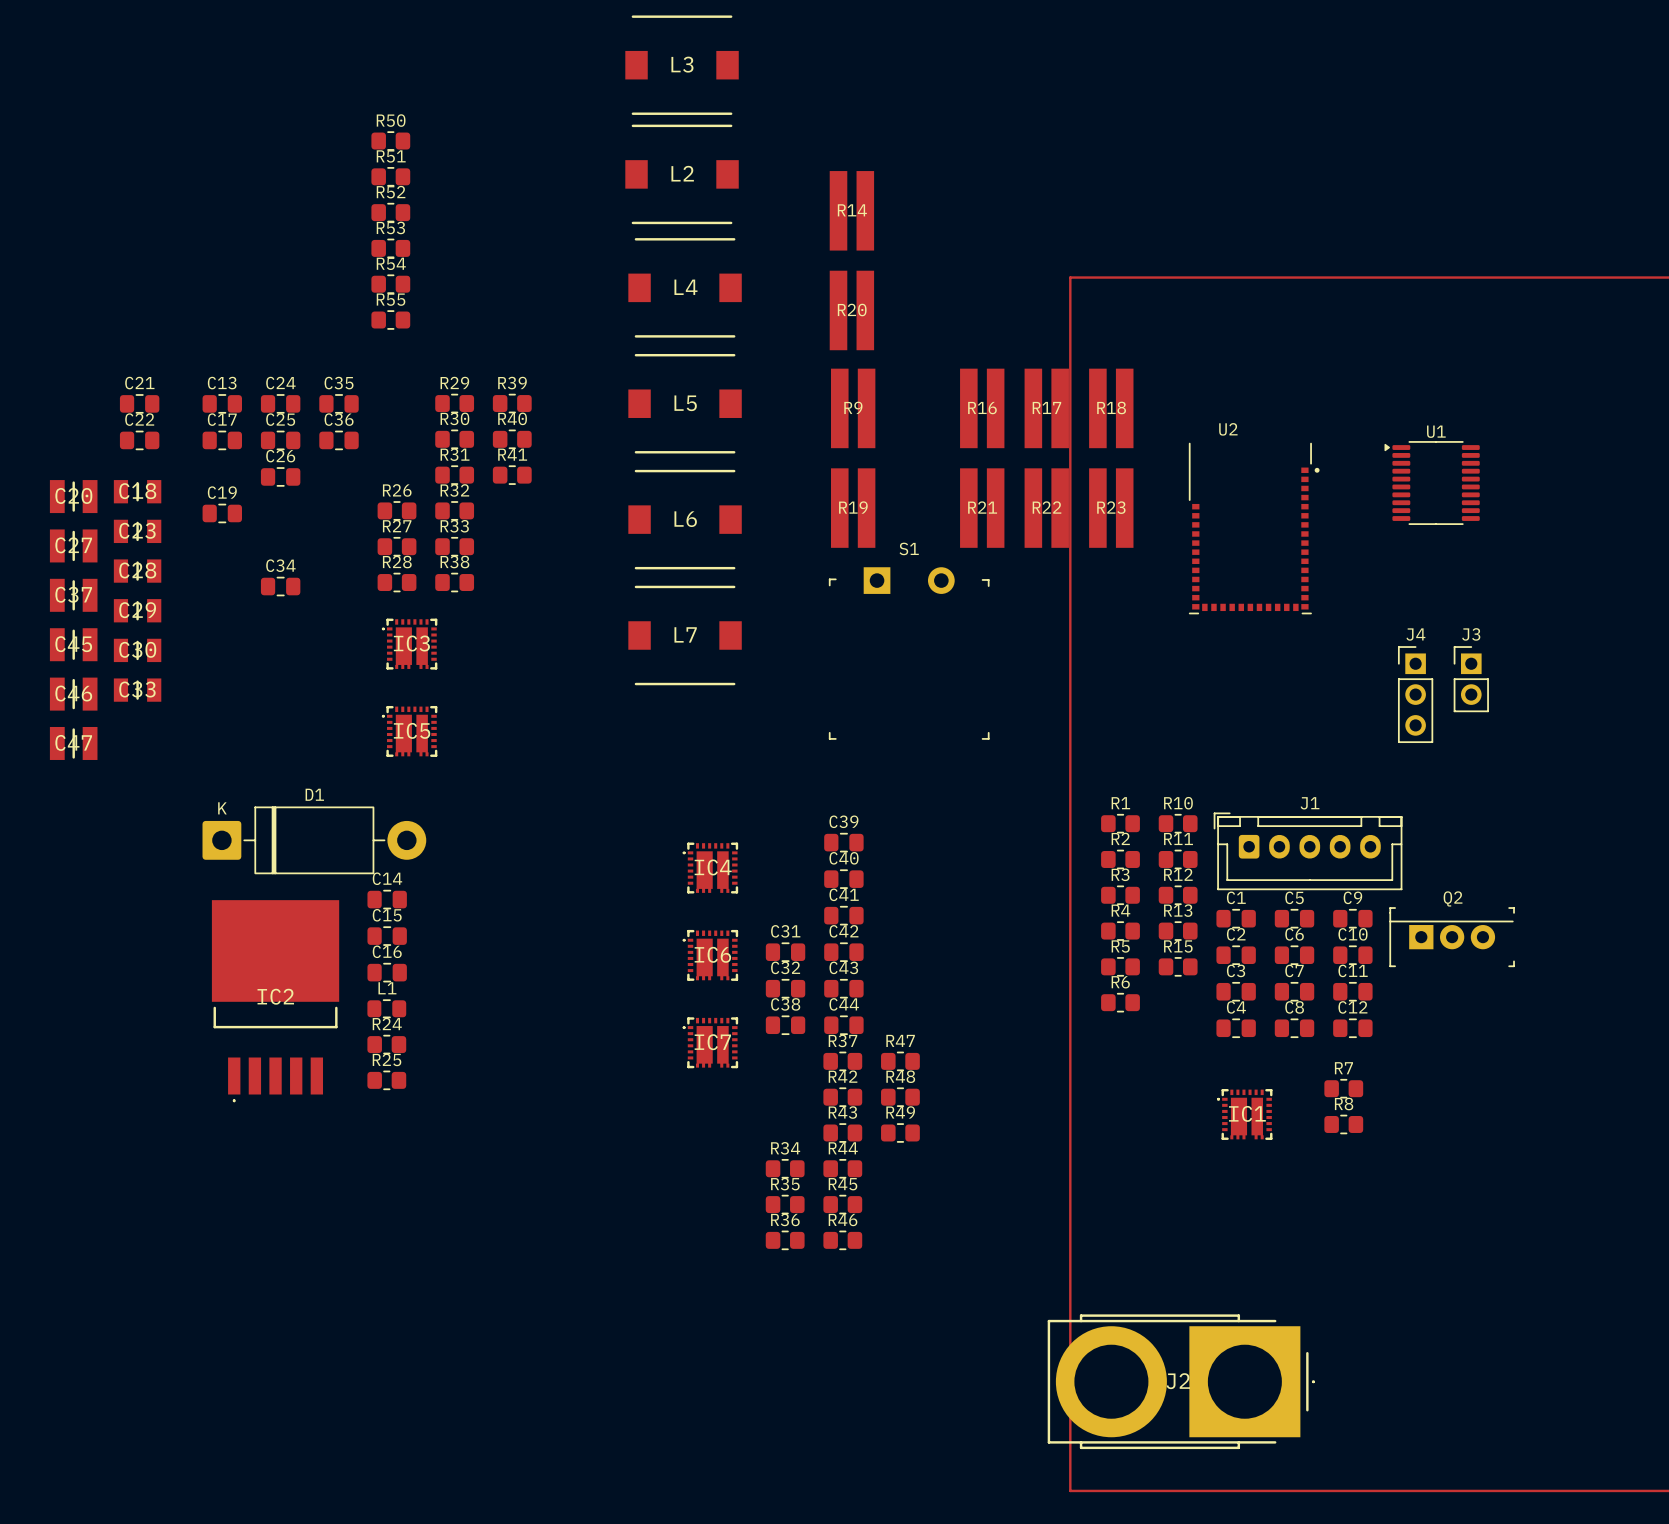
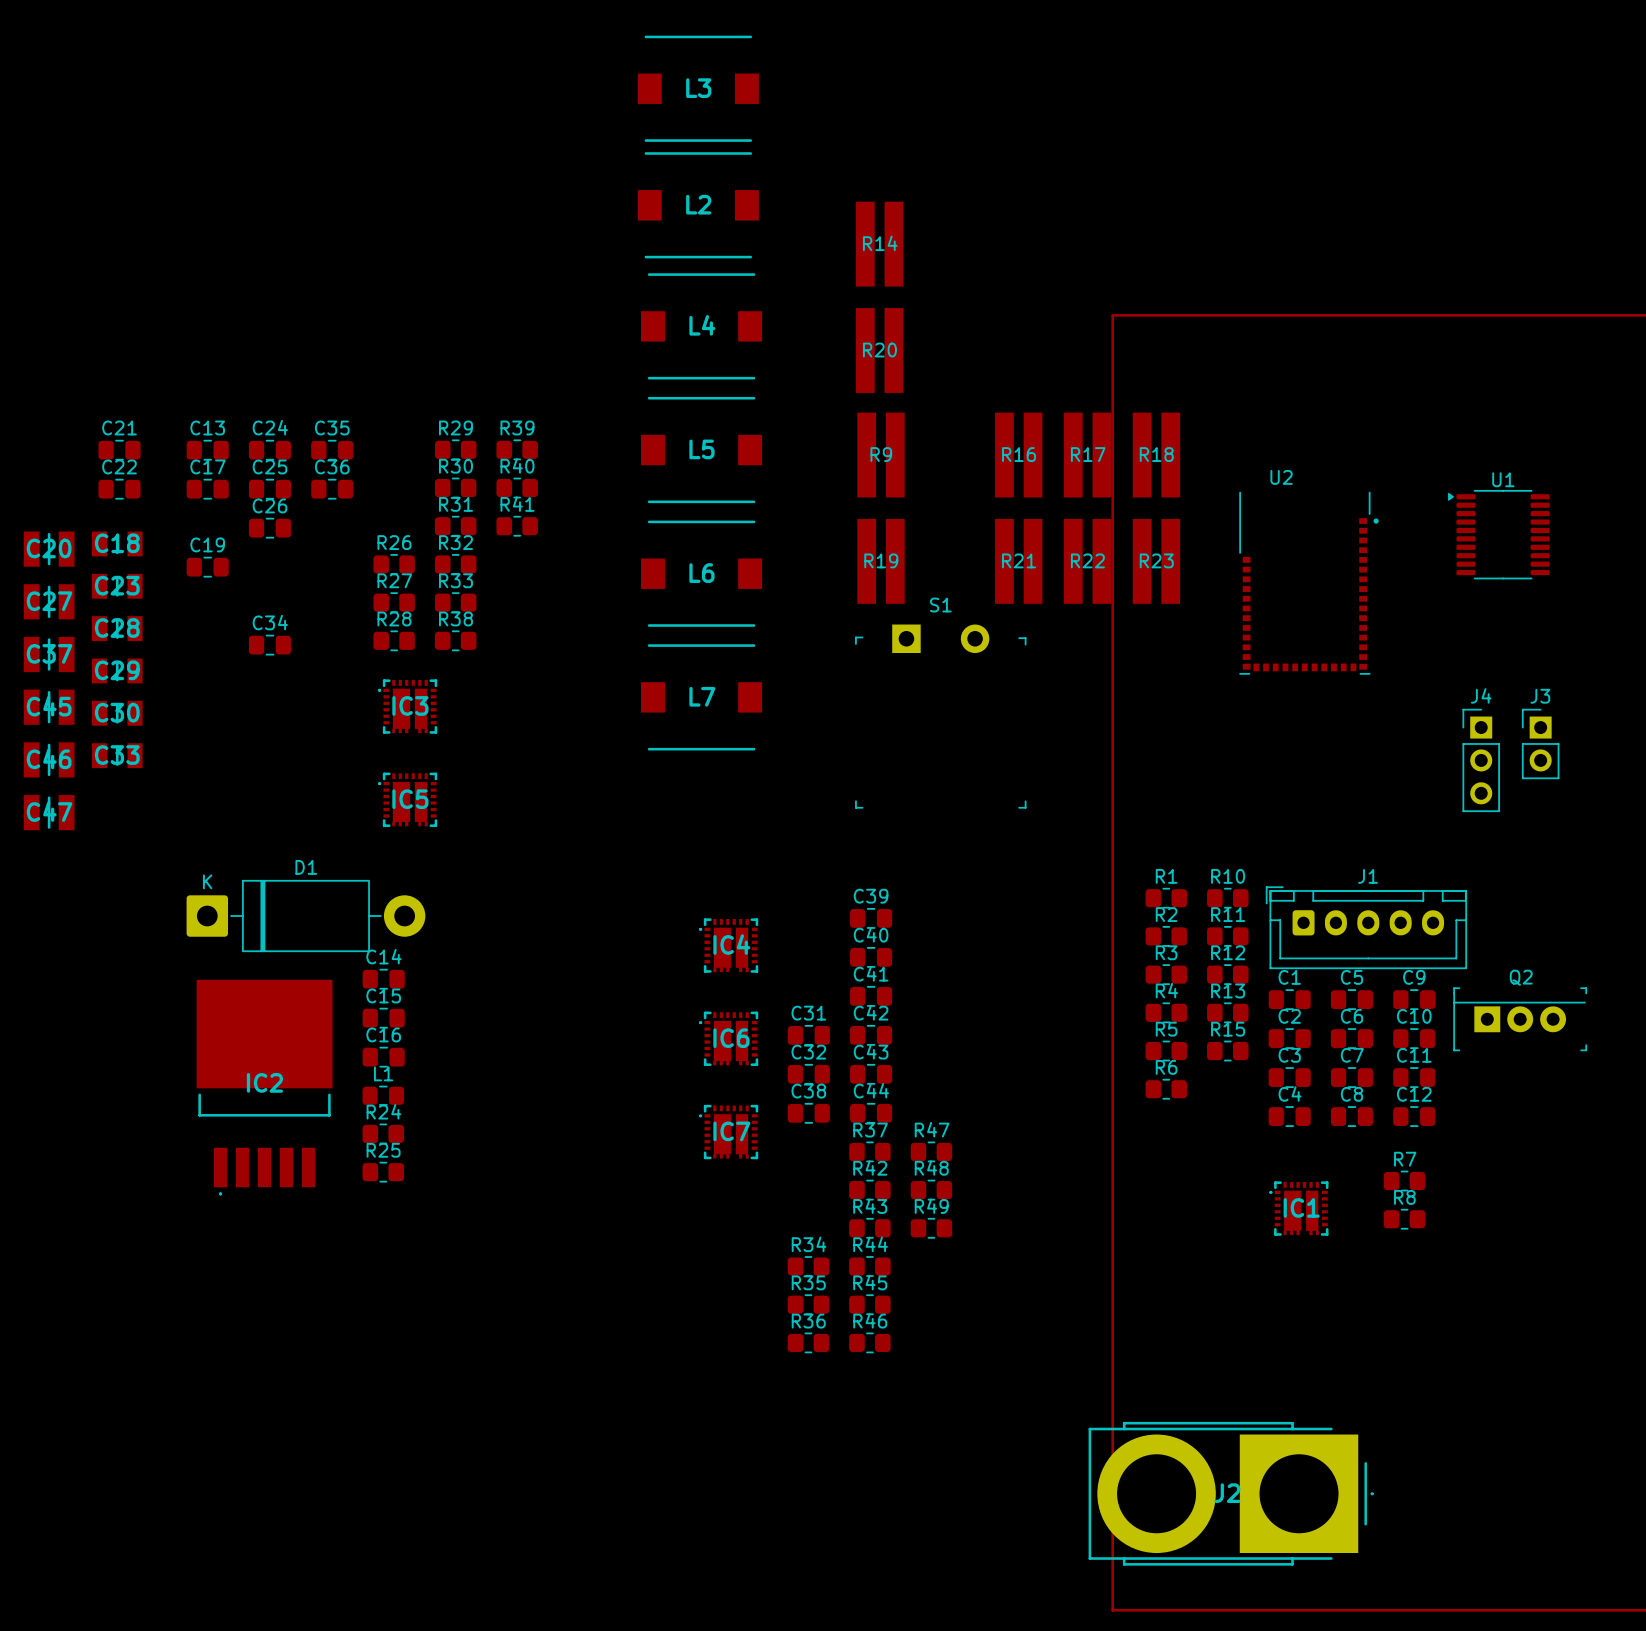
R50: (390, 141) -> none
R51: (390, 176) -> none
R52: (390, 212) -> none
R53: (390, 248) -> none
R54: (390, 284) -> none
R55: (390, 320) -> none

